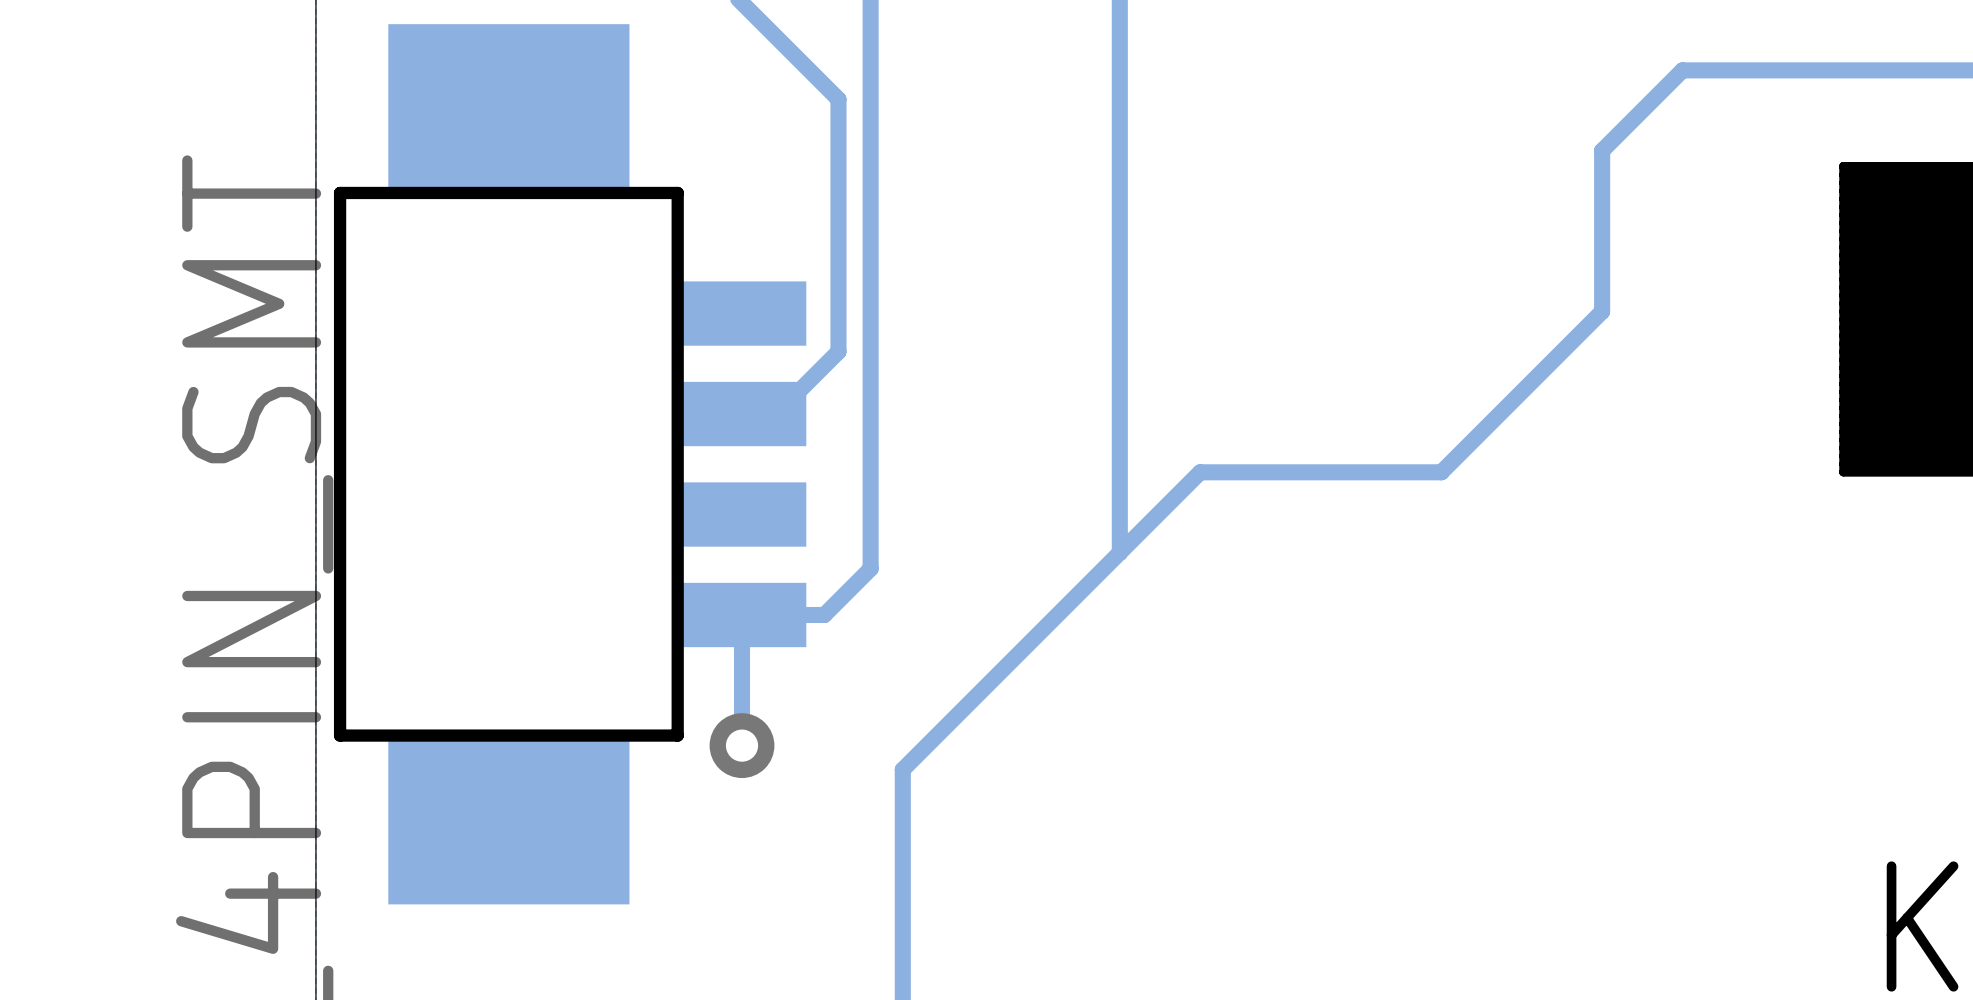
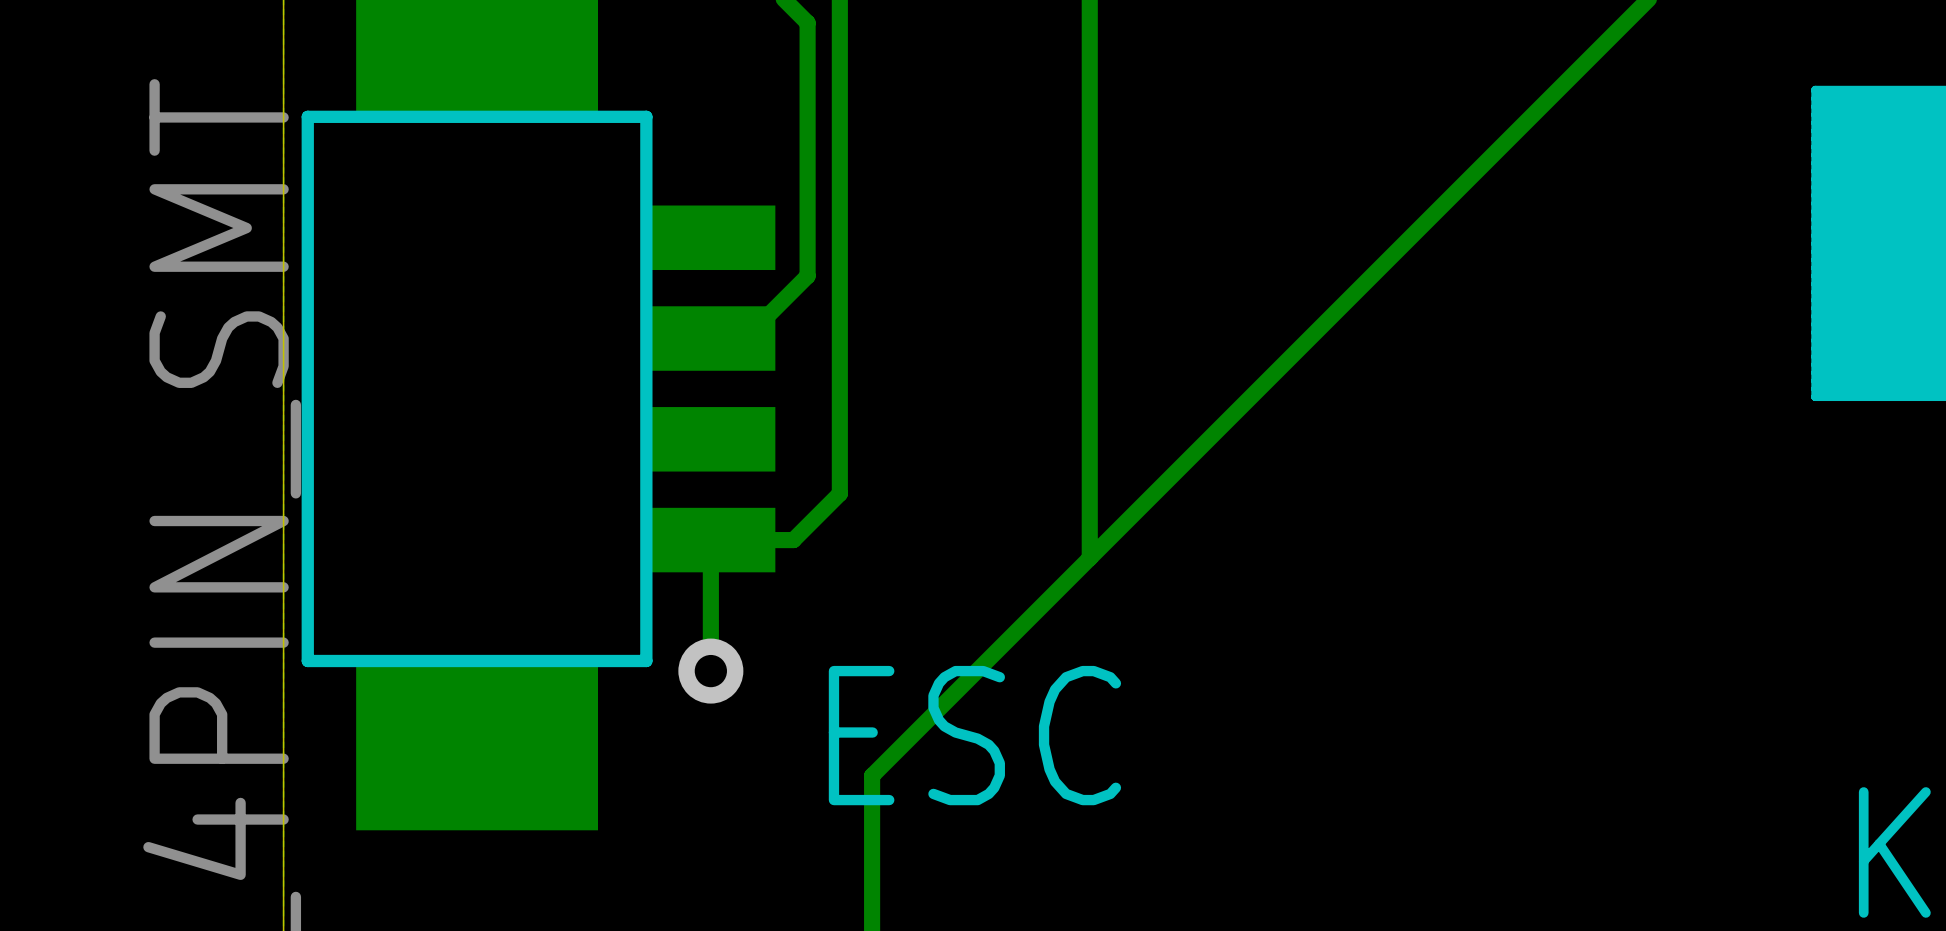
track: (1602, 150) (1602, 311) (1441, 472) (1200, 472) (902, 769) (902, 850) -> (1573, 74) (872, 775)
track: none -> (1089, 477) (1089, 558)
ESC name: none -> ESC (974, 735)

